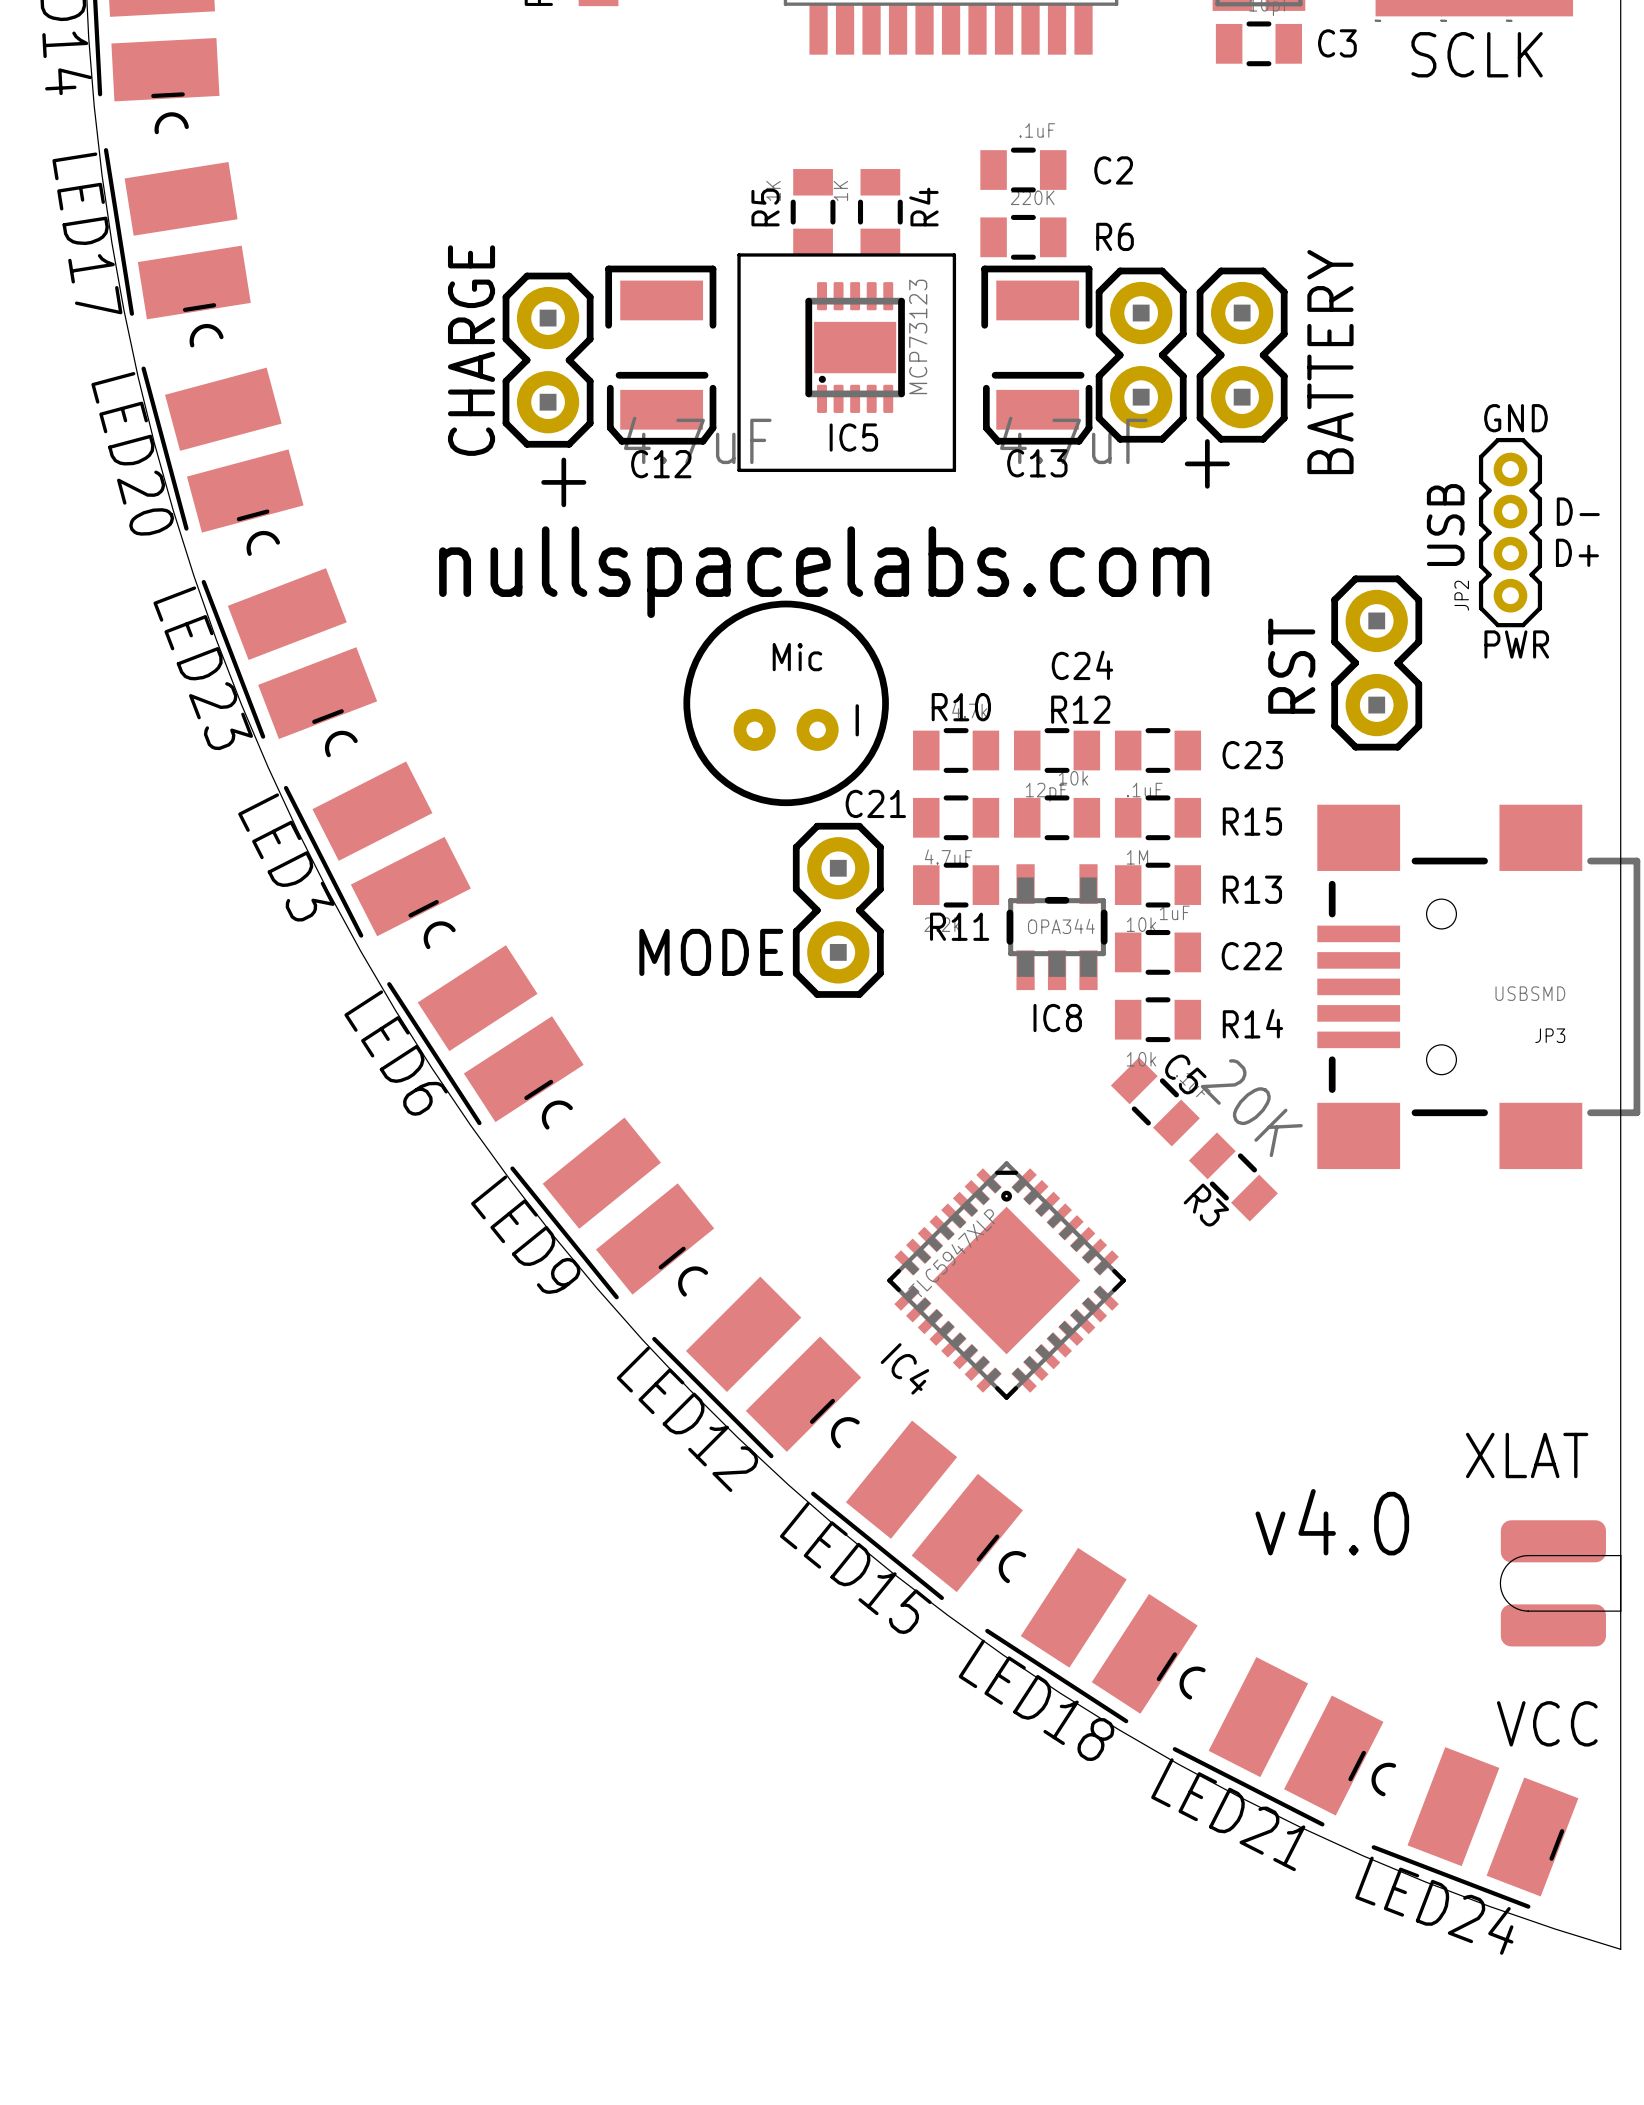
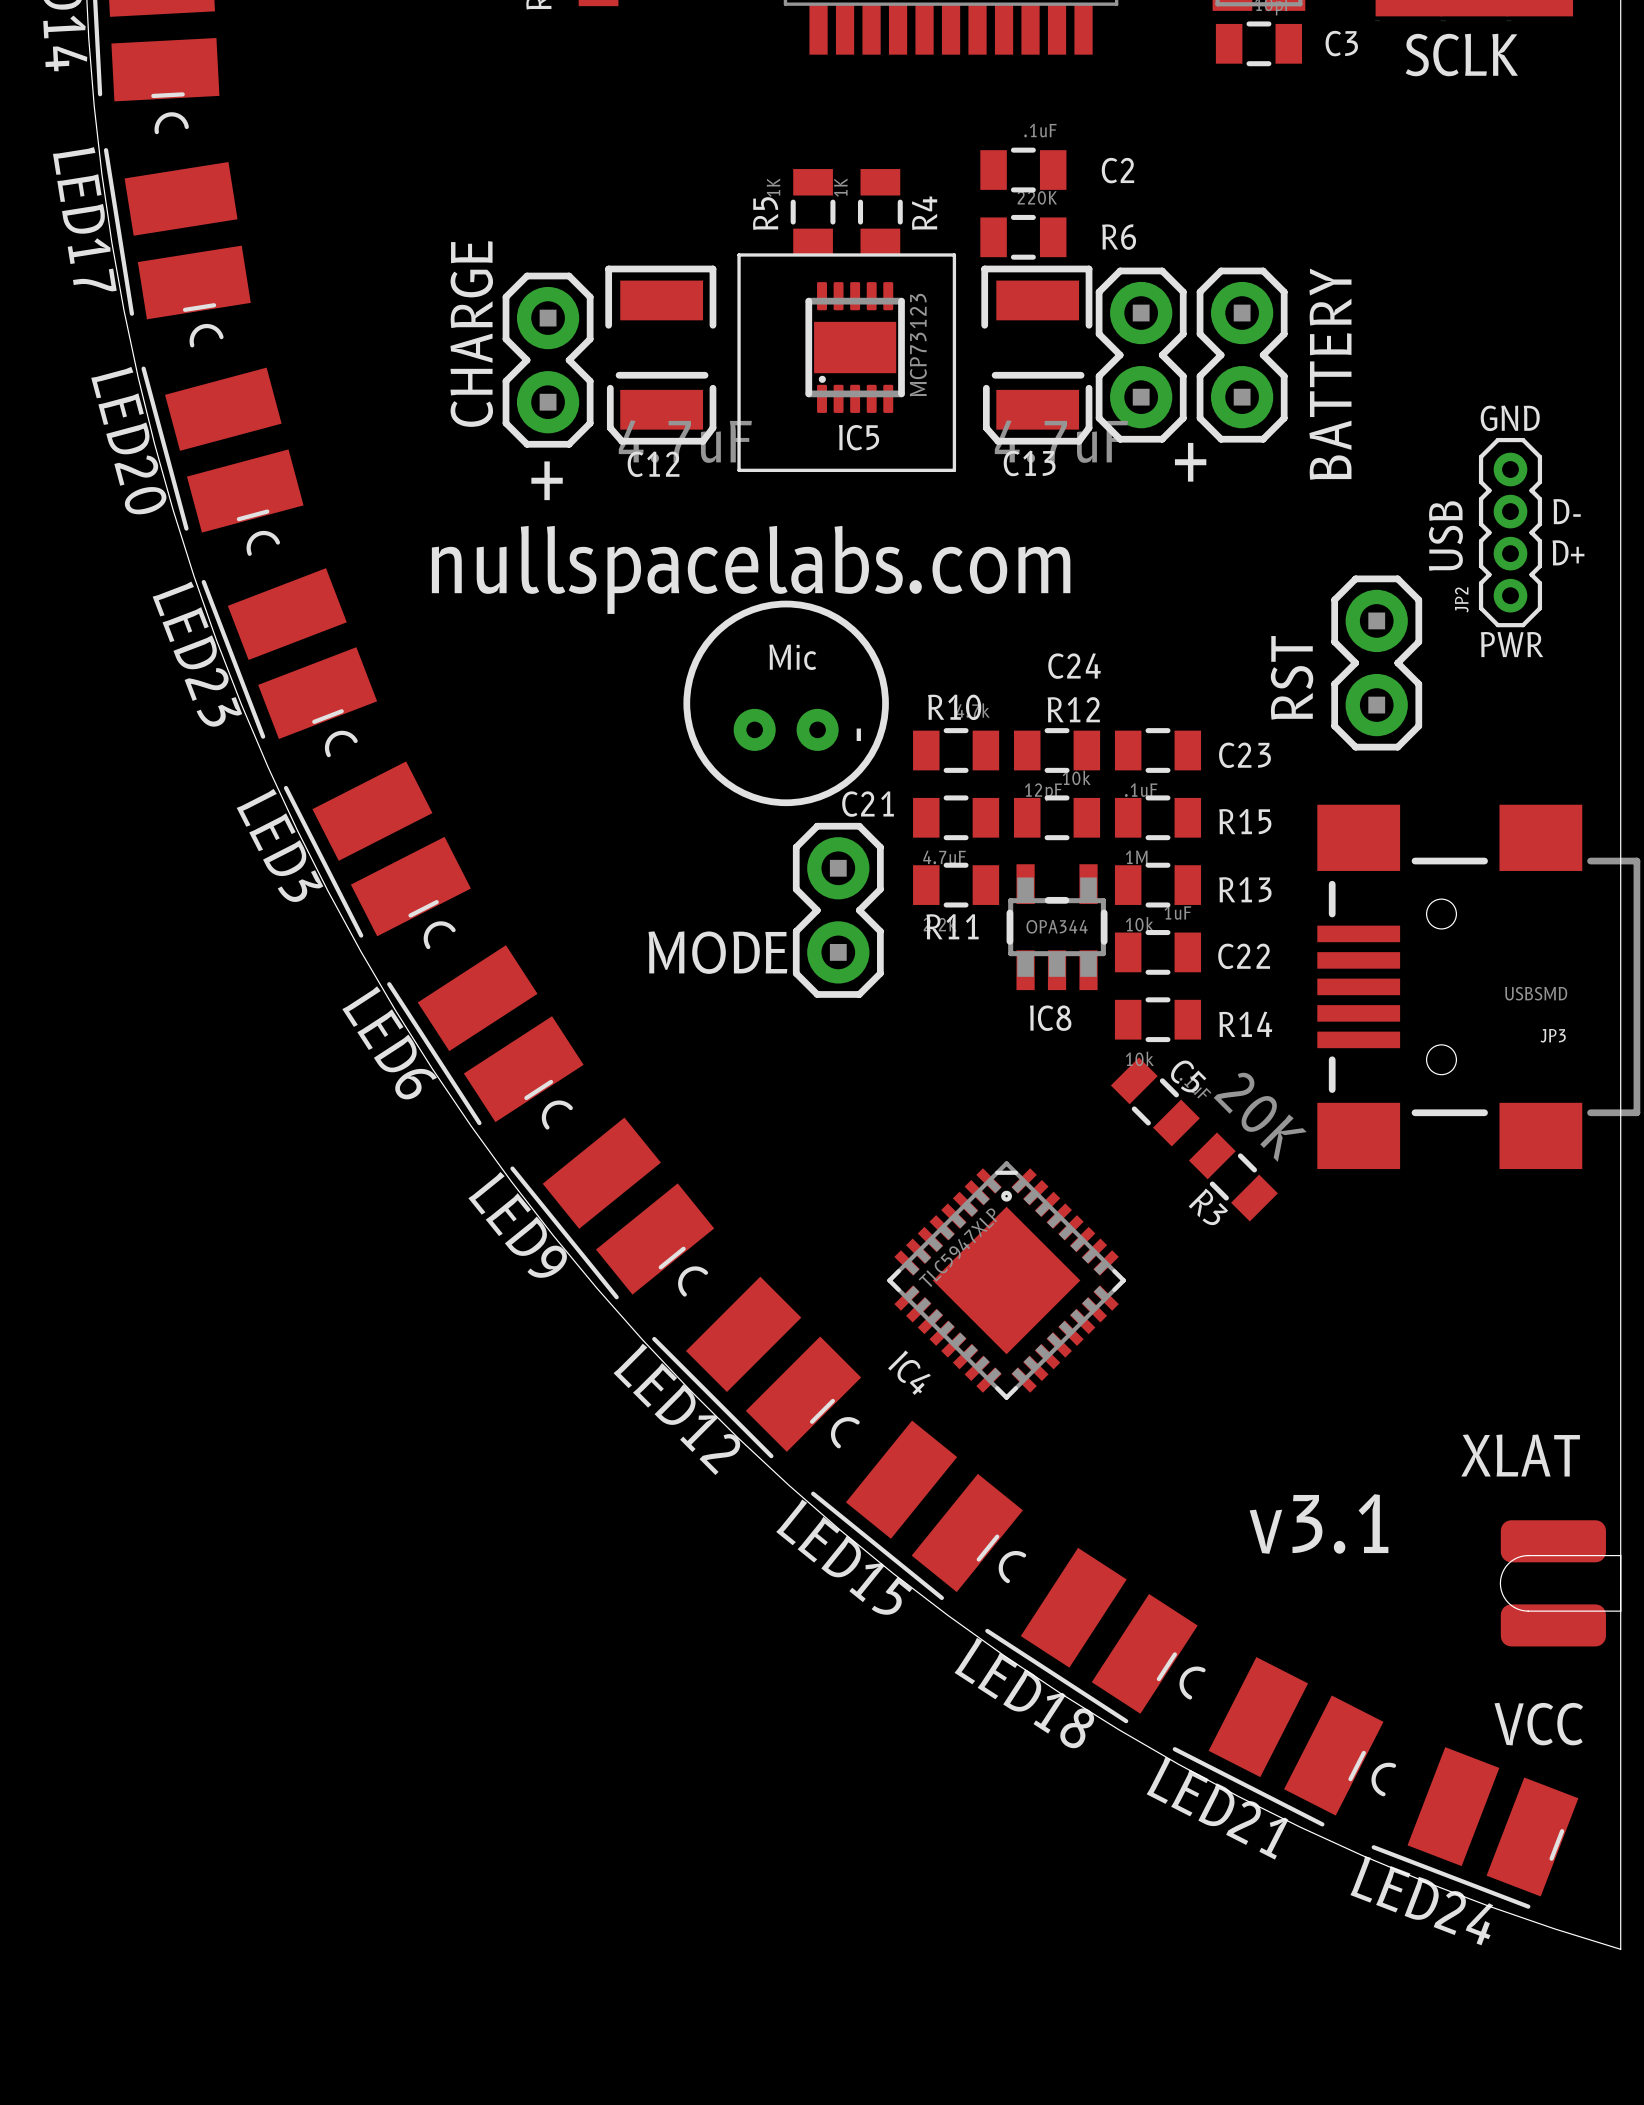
text: v4.0 (1332, 1522) -> v3.1 (1319, 1524)

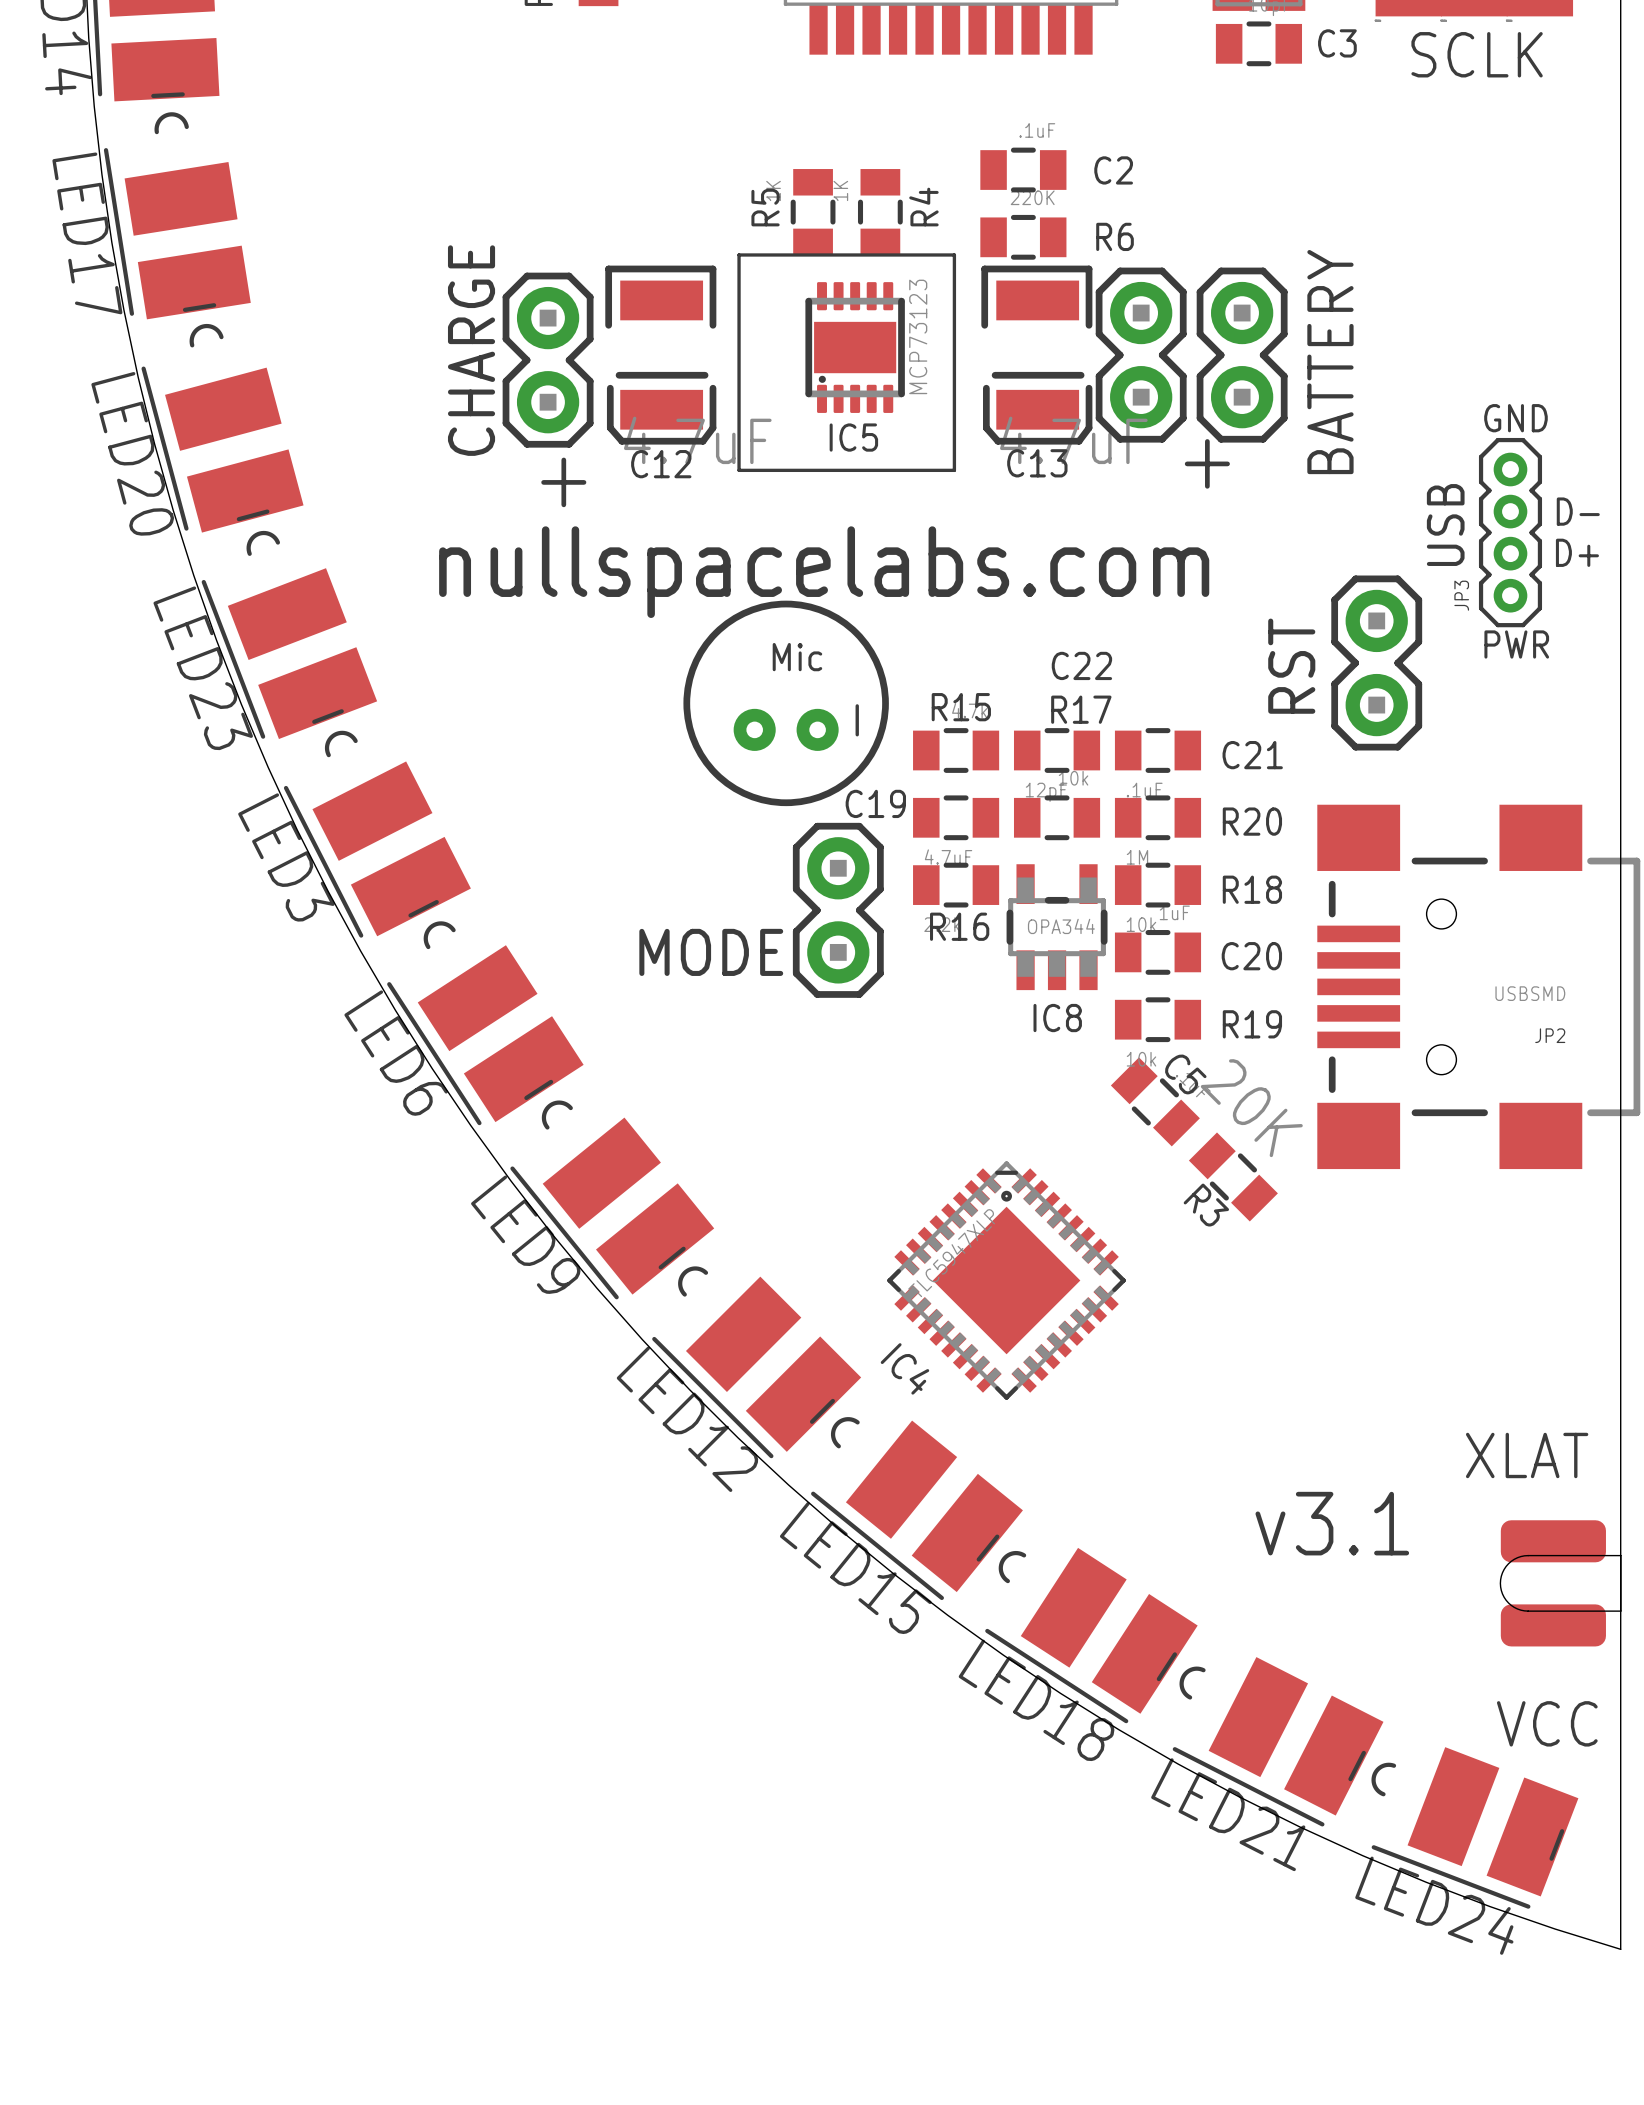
JP2 name: JP2 (1461, 599) -> JP3 (1461, 595)
C24 name: C24 (1074, 666) -> C22 (1081, 665)
R10 name: R10 (954, 707) -> R15 (961, 707)
R12 name: R12 (1073, 709) -> R17 (1081, 709)
C23 name: C23 (1244, 755) -> C21 (1252, 755)
C21 name: C21 (868, 804) -> C19 (875, 803)
R15 name: R15 (1245, 821) -> R20 (1252, 821)
R13 name: R13 (1245, 889) -> R18 (1252, 889)
R11 name: R11 (952, 926) -> R16 (959, 926)
C22 name: C22 (1244, 956) -> C20 (1251, 956)
R14 name: R14 (1245, 1024) -> R19 (1252, 1024)
JP3 name: JP3 (1553, 1035) -> JP2 (1550, 1035)

